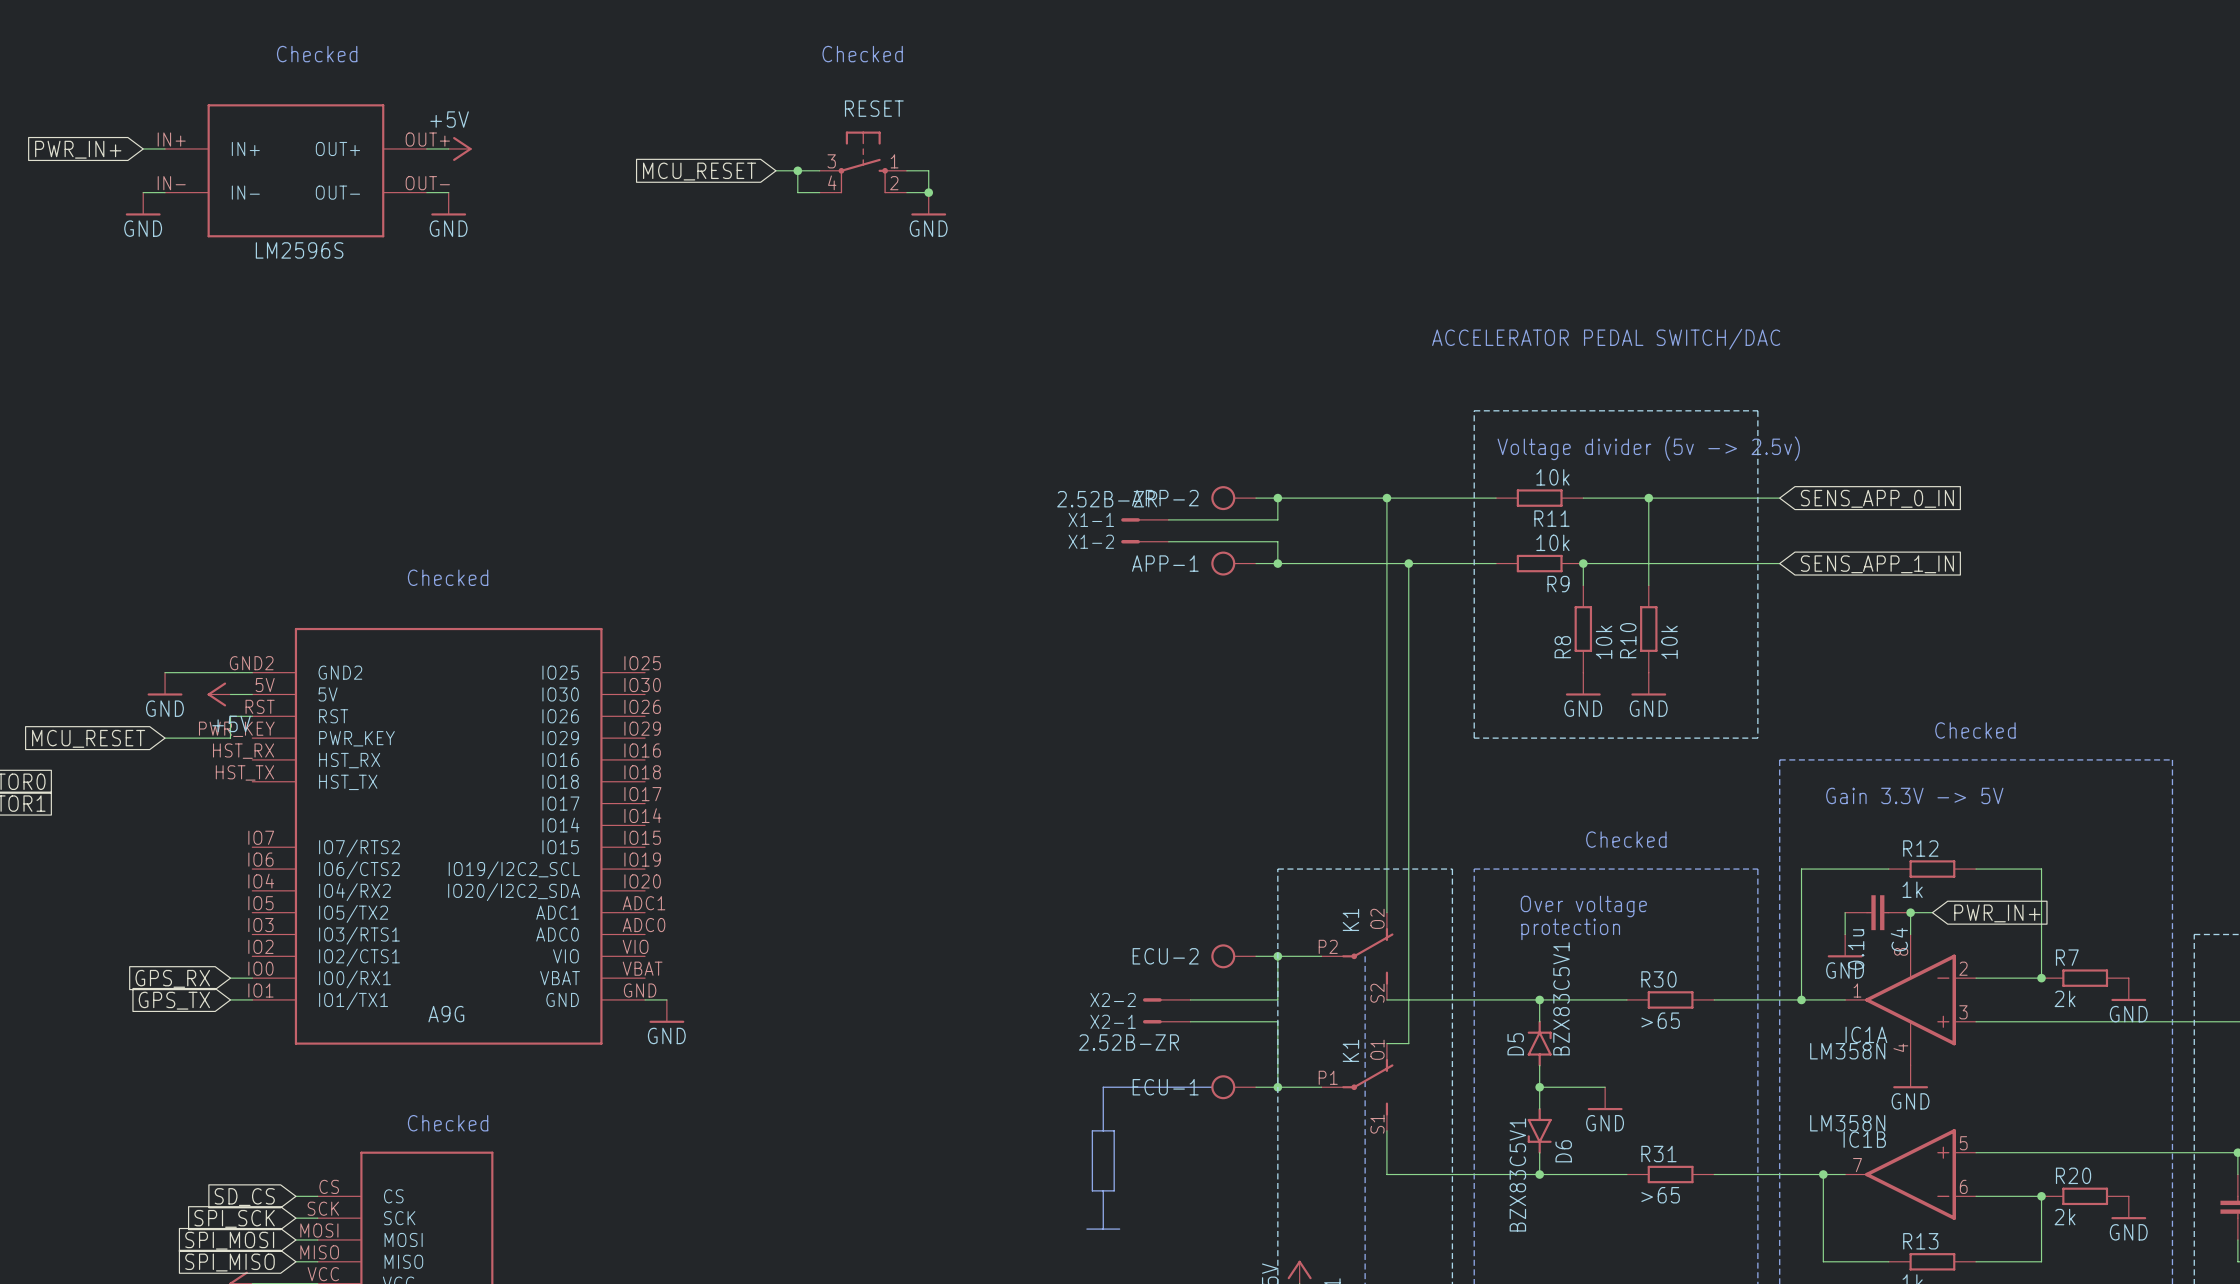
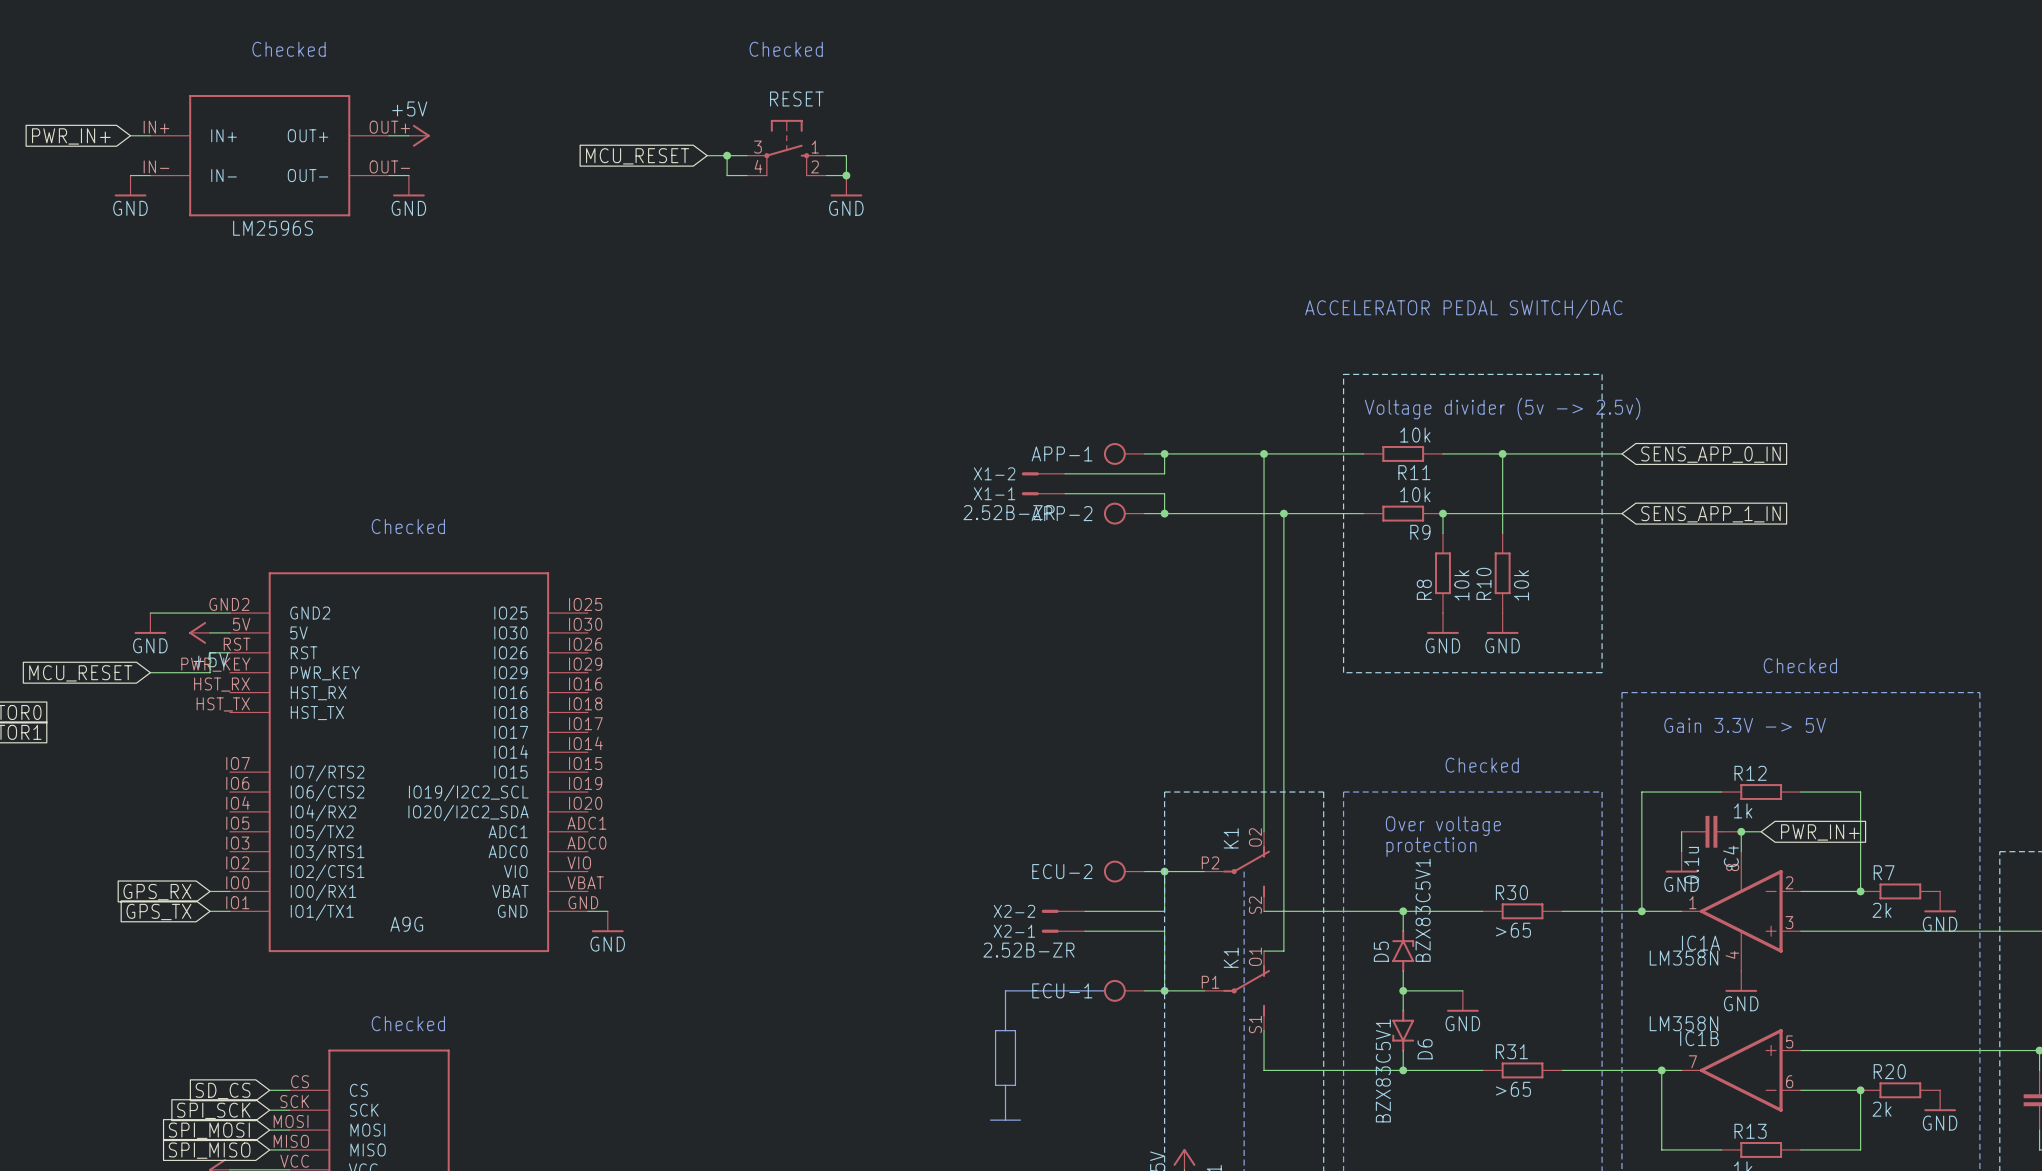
APP-2 name: APP-2 (1165, 498) -> APP-1 (1062, 453)
X1-1 value: 2.52B-ZR (1107, 499) -> none
X1-1 name: X1-1 (1091, 519) -> X1-2 (994, 473)
X1-2 name: X1-2 (1091, 541) -> X1-1 (994, 493)
X1-2 value: none -> 2.52B-ZR (1009, 512)
APP-1 name: APP-1 (1165, 563) -> APP-2 (1062, 513)

